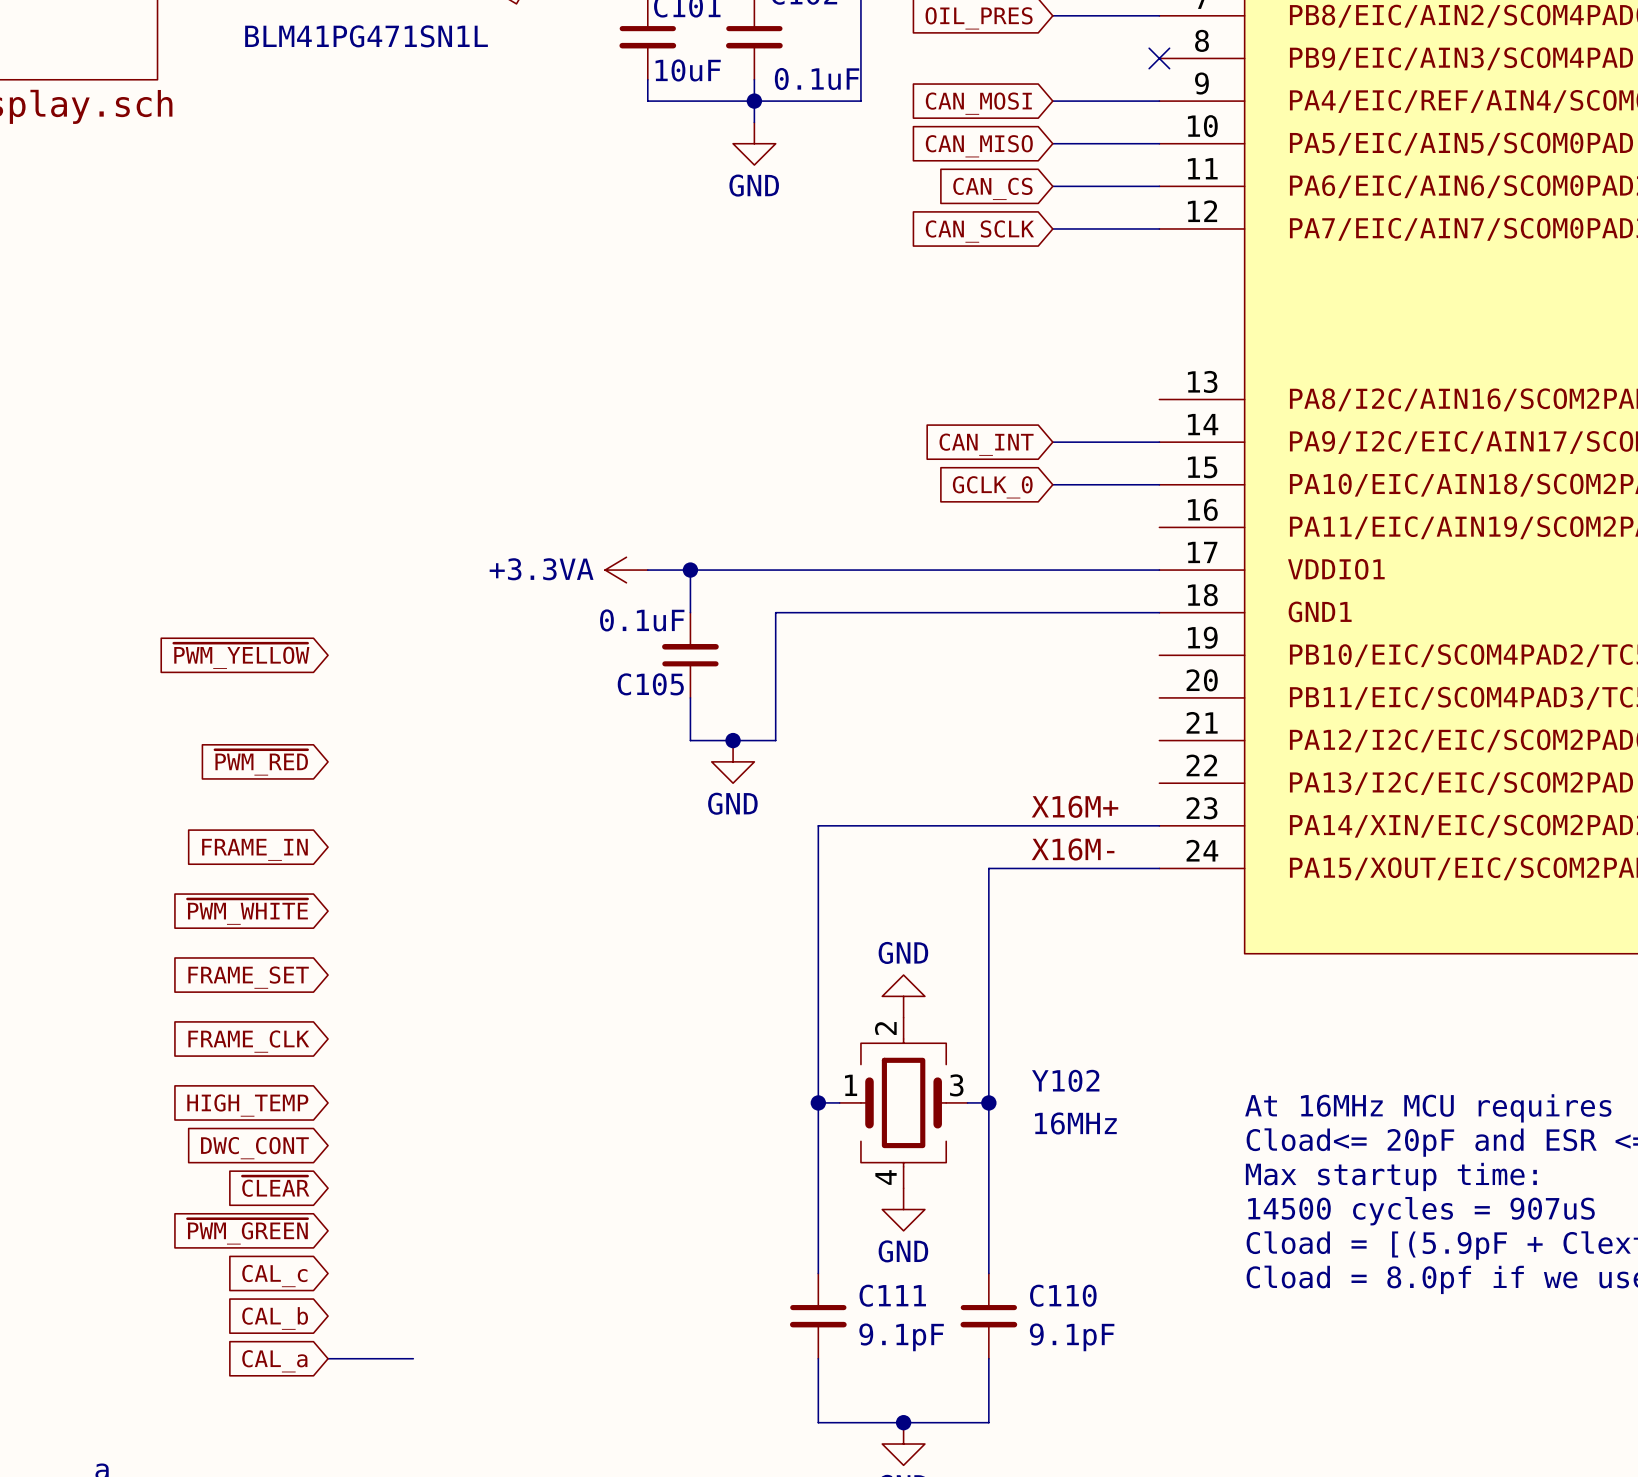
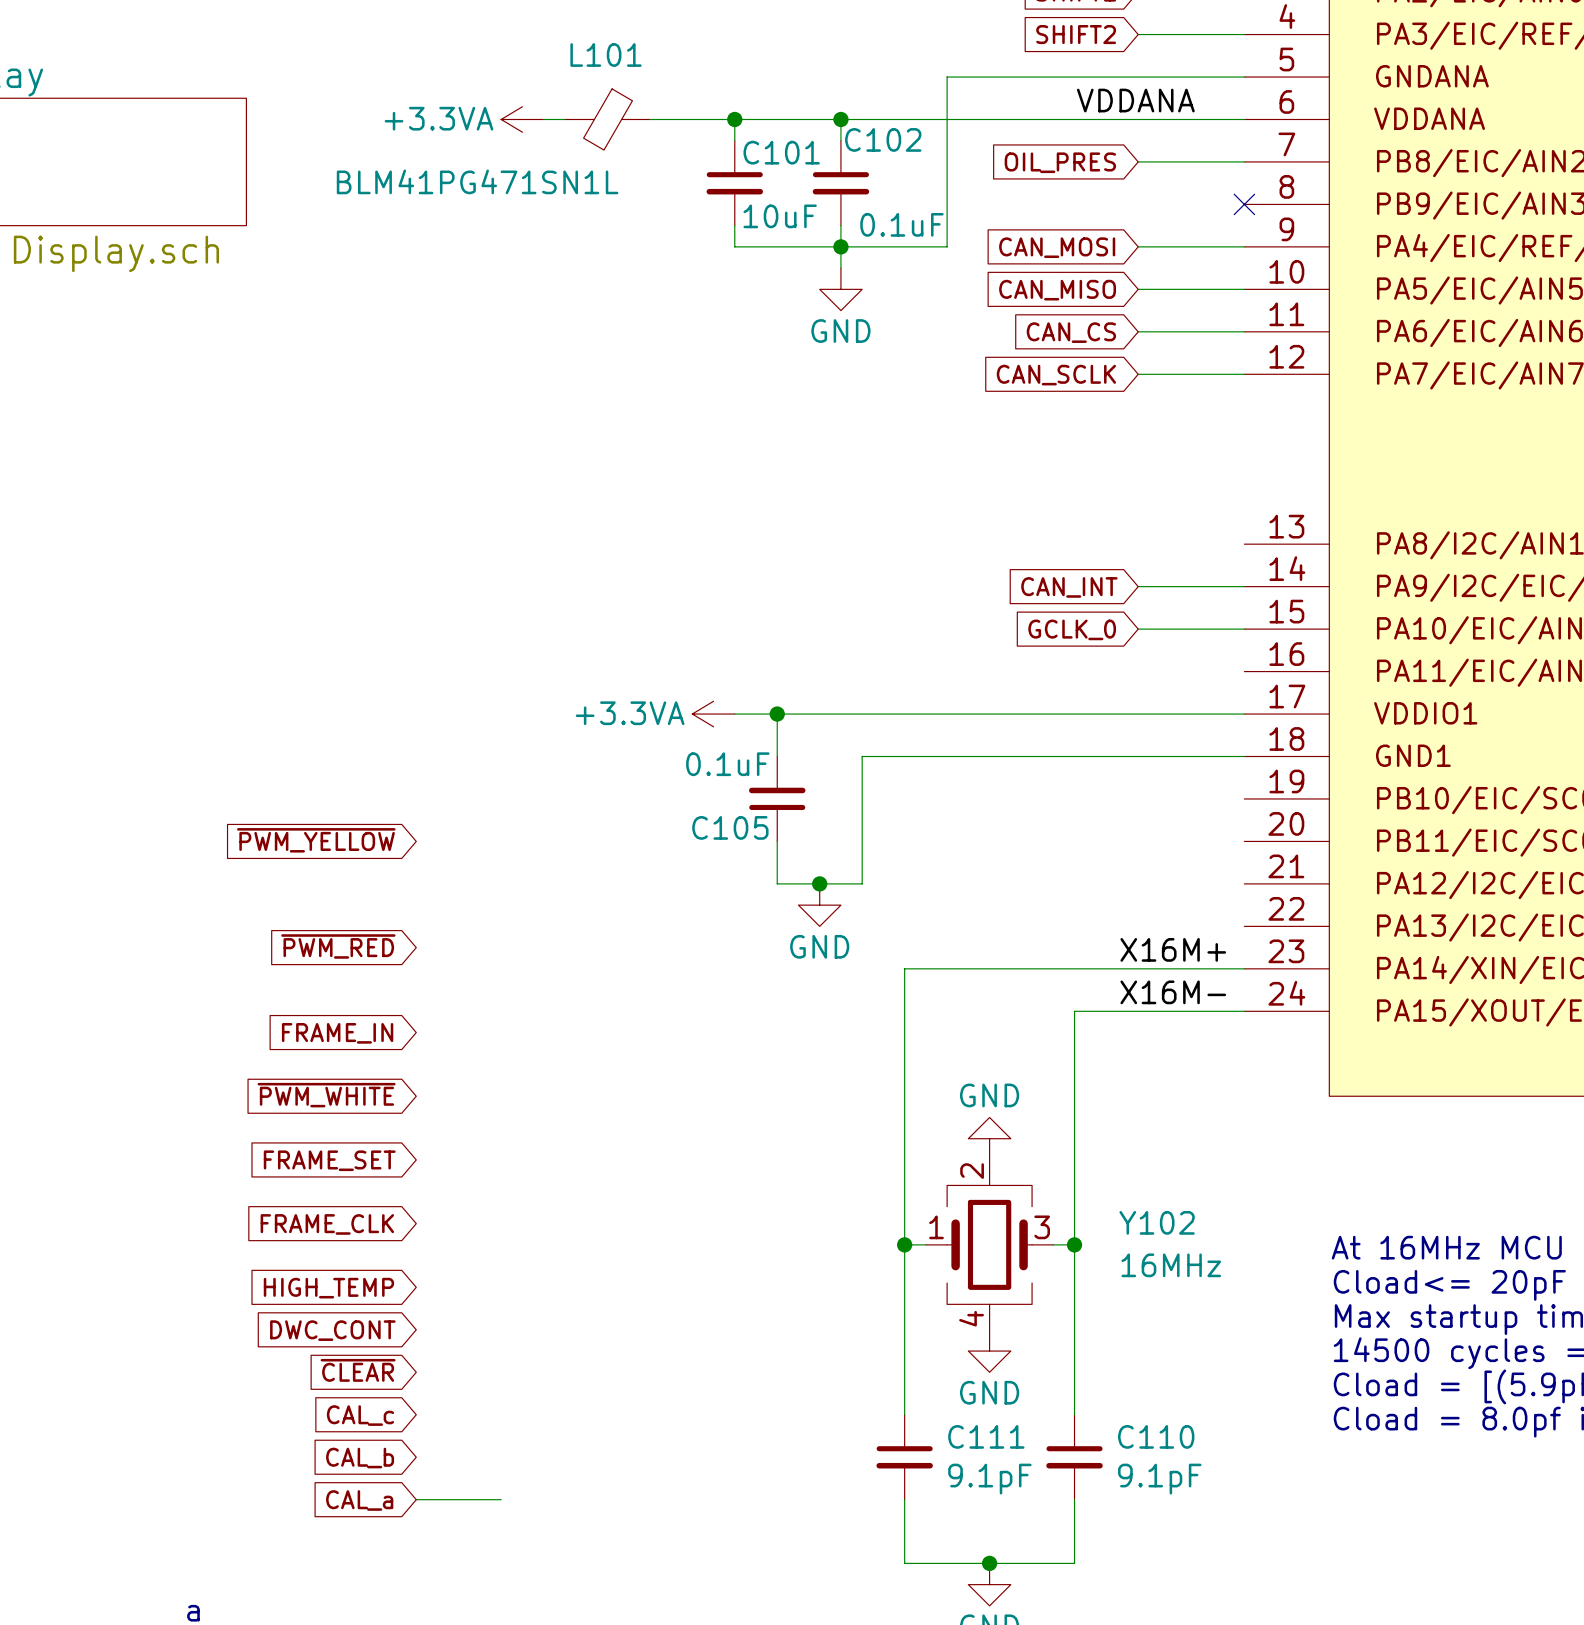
global label position: ~{PWM_YELLOW} (241, 656) -> ~{PWM_YELLOW} (316, 840)
global label position: ~{PWM_RED} (261, 762) -> ~{PWM_RED} (338, 946)
global label position: FRAME_IN (254, 849) -> FRAME_IN (337, 1033)
global label position: ~{PWM_WHITE} (247, 911) -> ~{PWM_WHITE} (326, 1095)
global label position: FRAME_SET (248, 977) -> FRAME_SET (329, 1160)
global label position: FRAME_CLK (248, 1041) -> FRAME_CLK (327, 1224)
global label: HIGH_TEMP (247, 1105) -> none
global label: DWC_CONT (254, 1148) -> HIGH_TEMP (328, 1288)
global label: ~{CLEAR} (275, 1186) -> DWC_CONT (332, 1330)
global label: ~{PWM_GREEN} (247, 1231) -> ~{CLEAR} (358, 1370)

